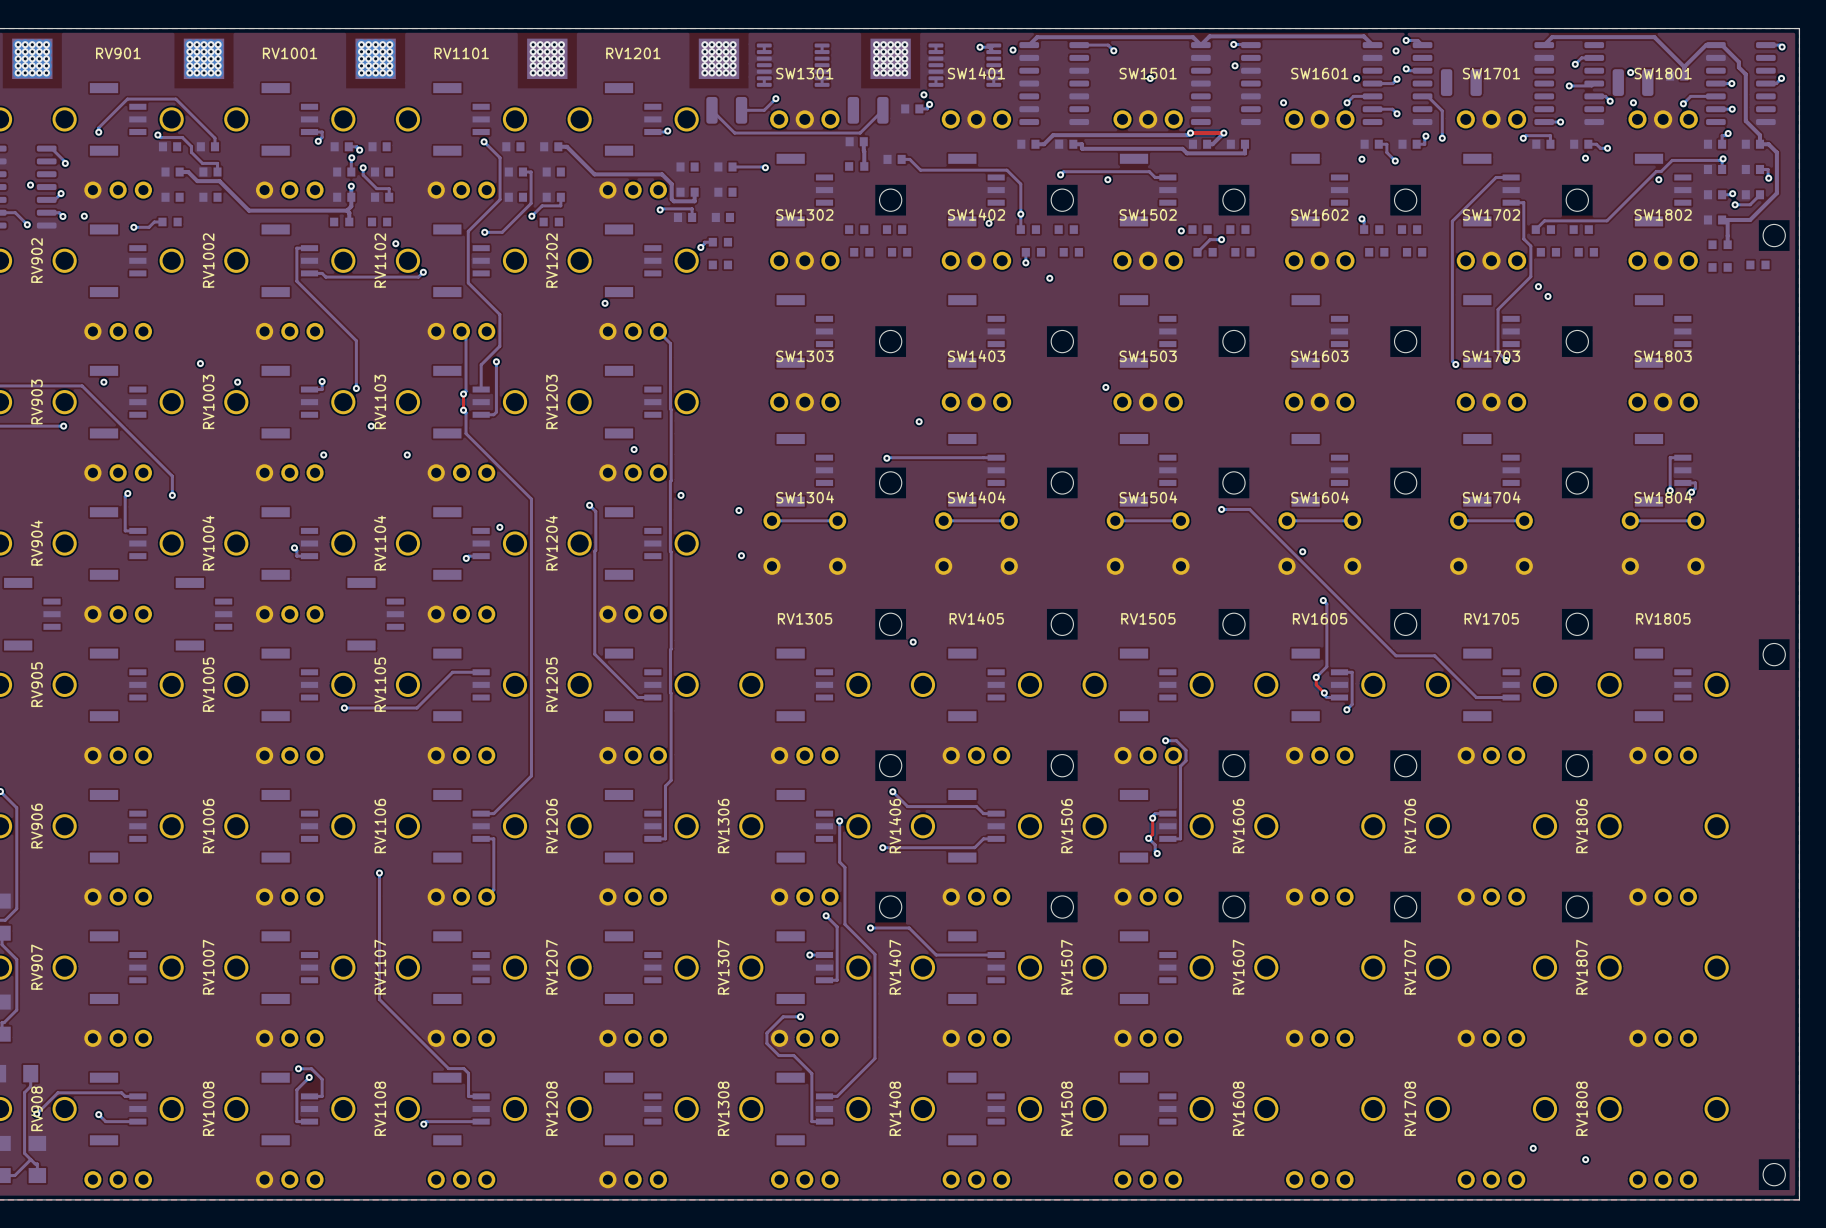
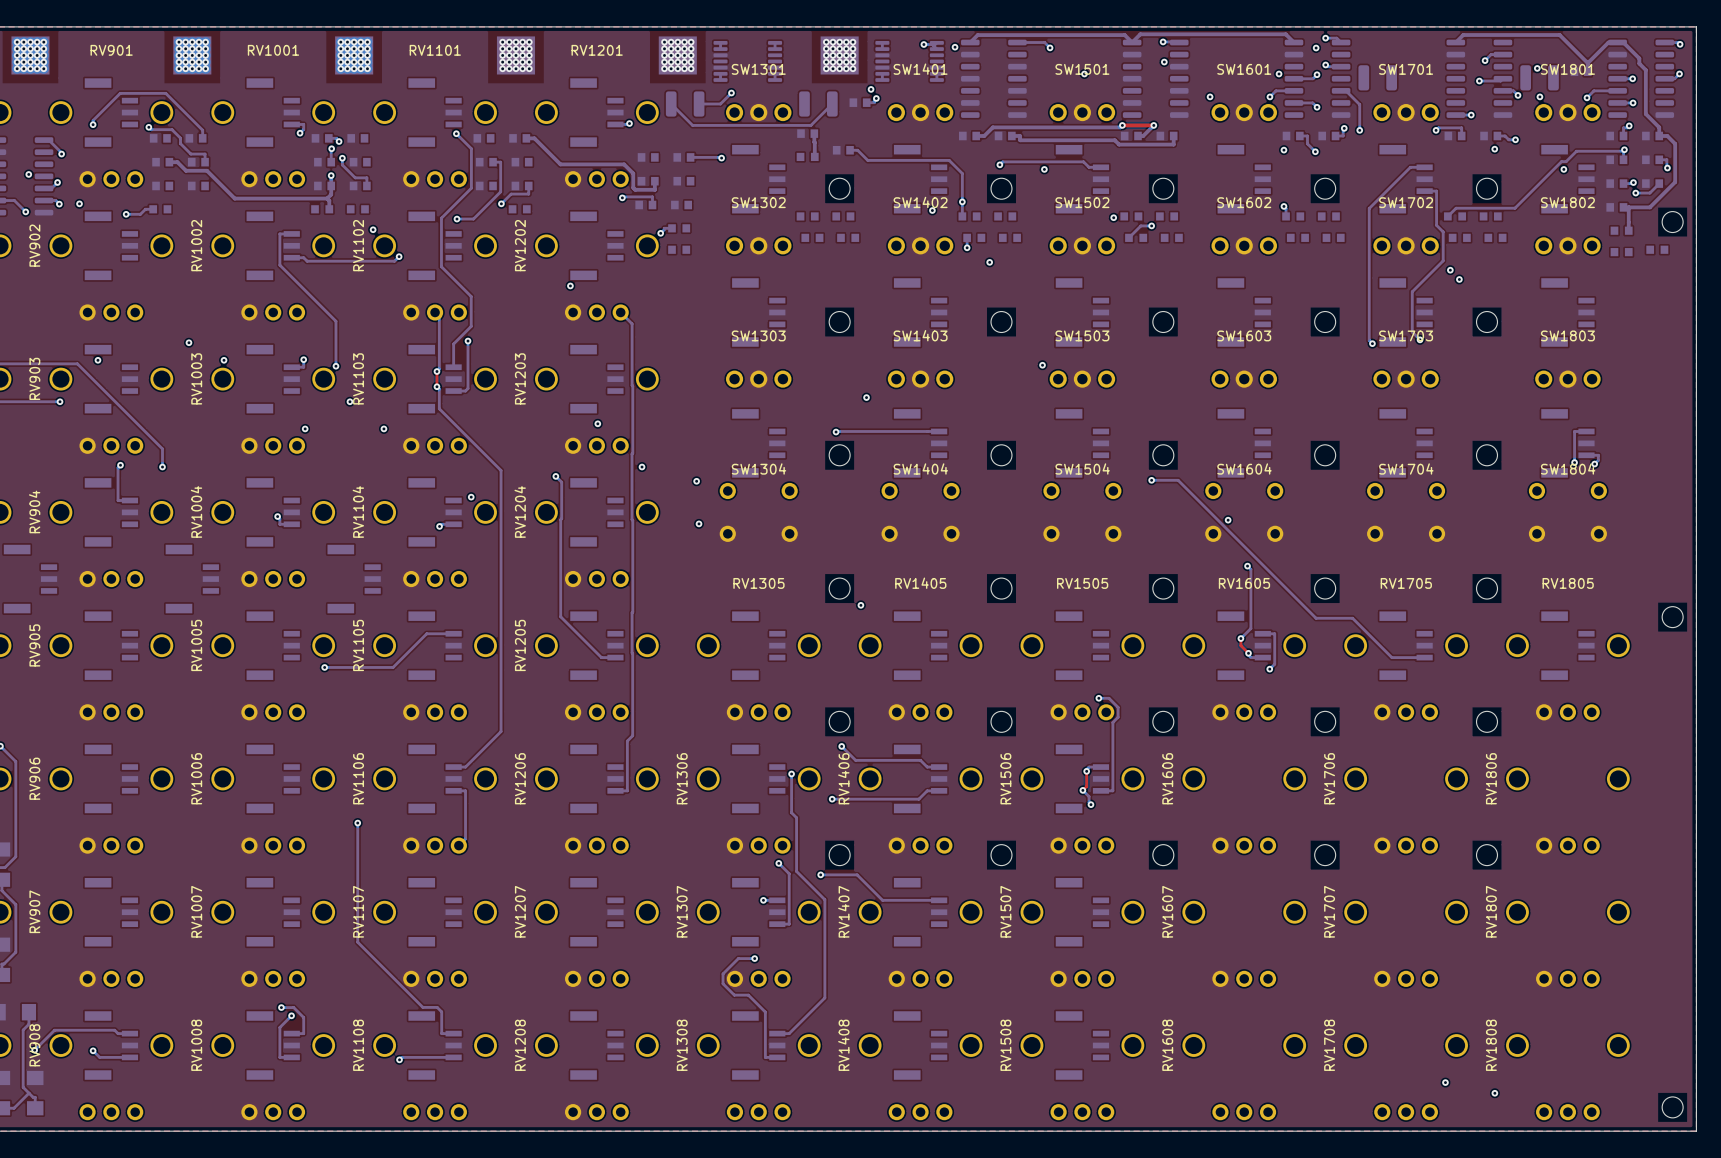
bottom track: (771, 520) (837, 520) -> none
bottom track: (943, 520) (1009, 520) -> none
bottom track: (1115, 520) (1180, 520) -> none
bottom track: (1286, 520) (1352, 520) -> none
bottom track: (1458, 520) (1524, 520) -> none
bottom track: (1630, 520) (1695, 520) -> none

